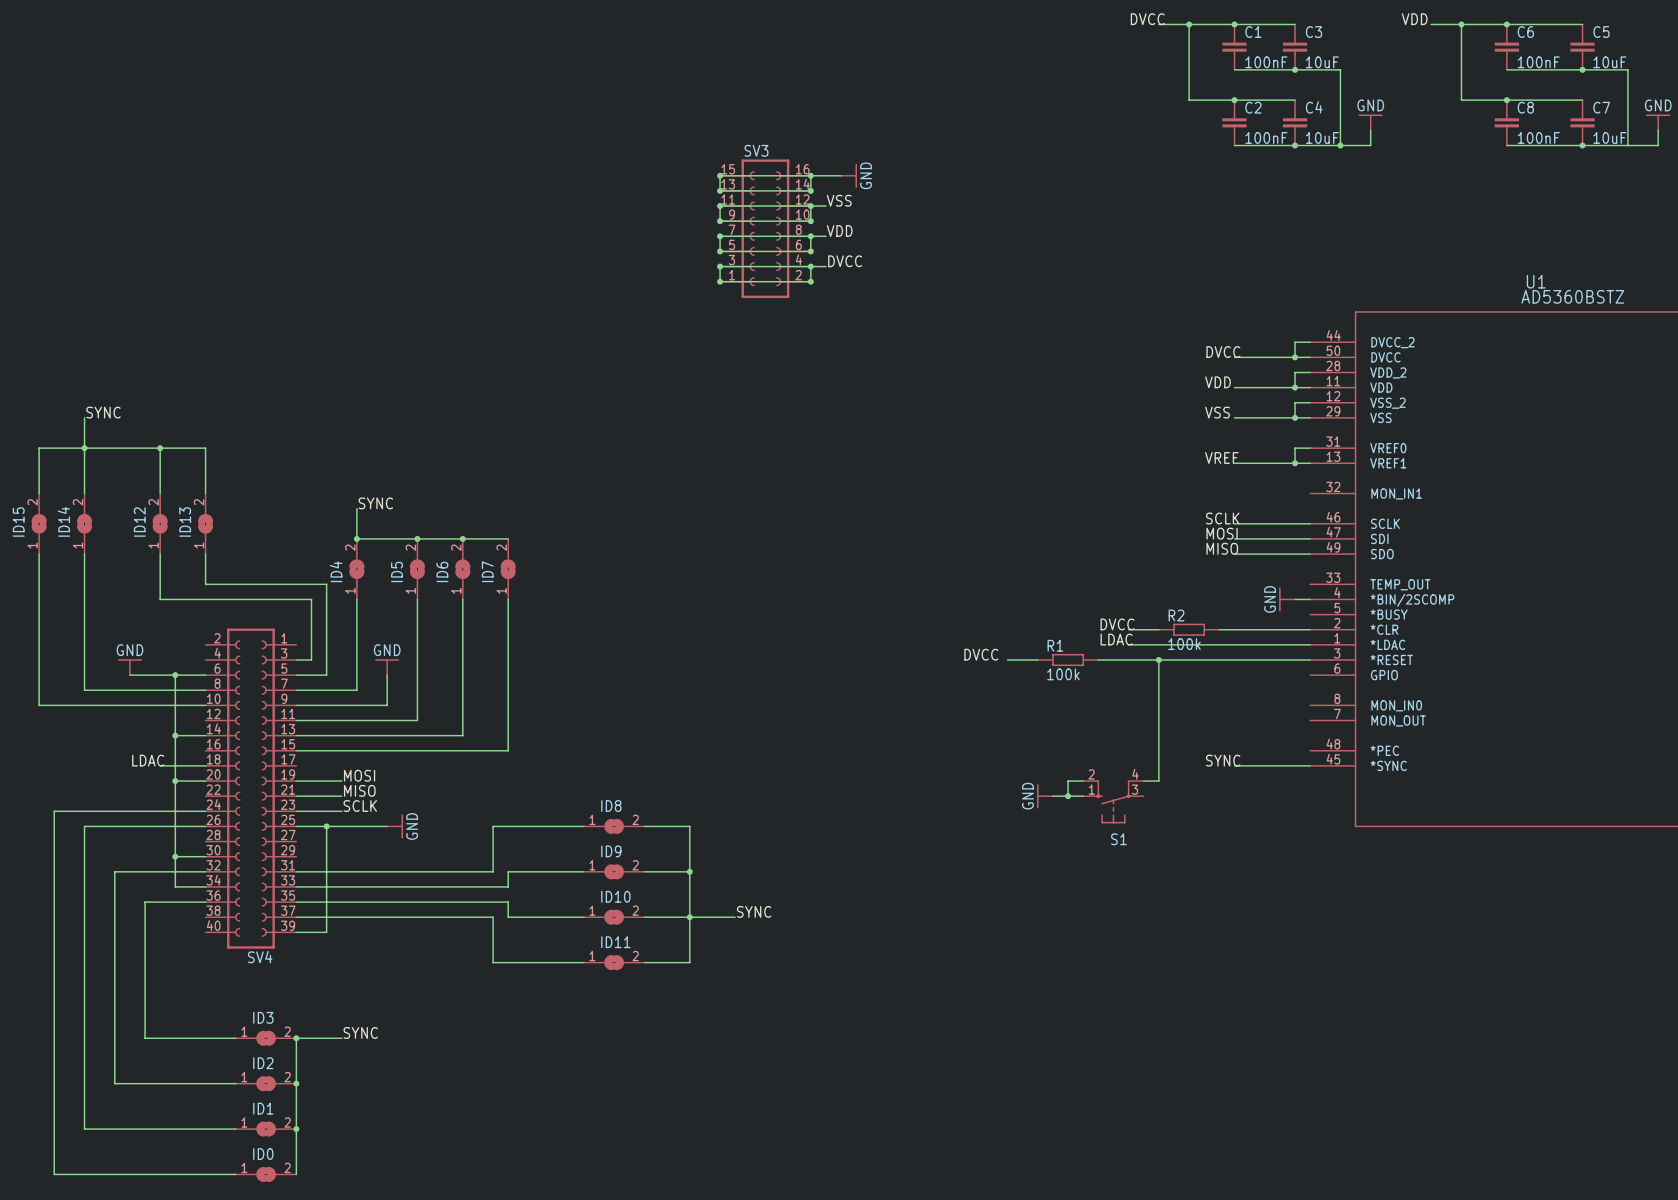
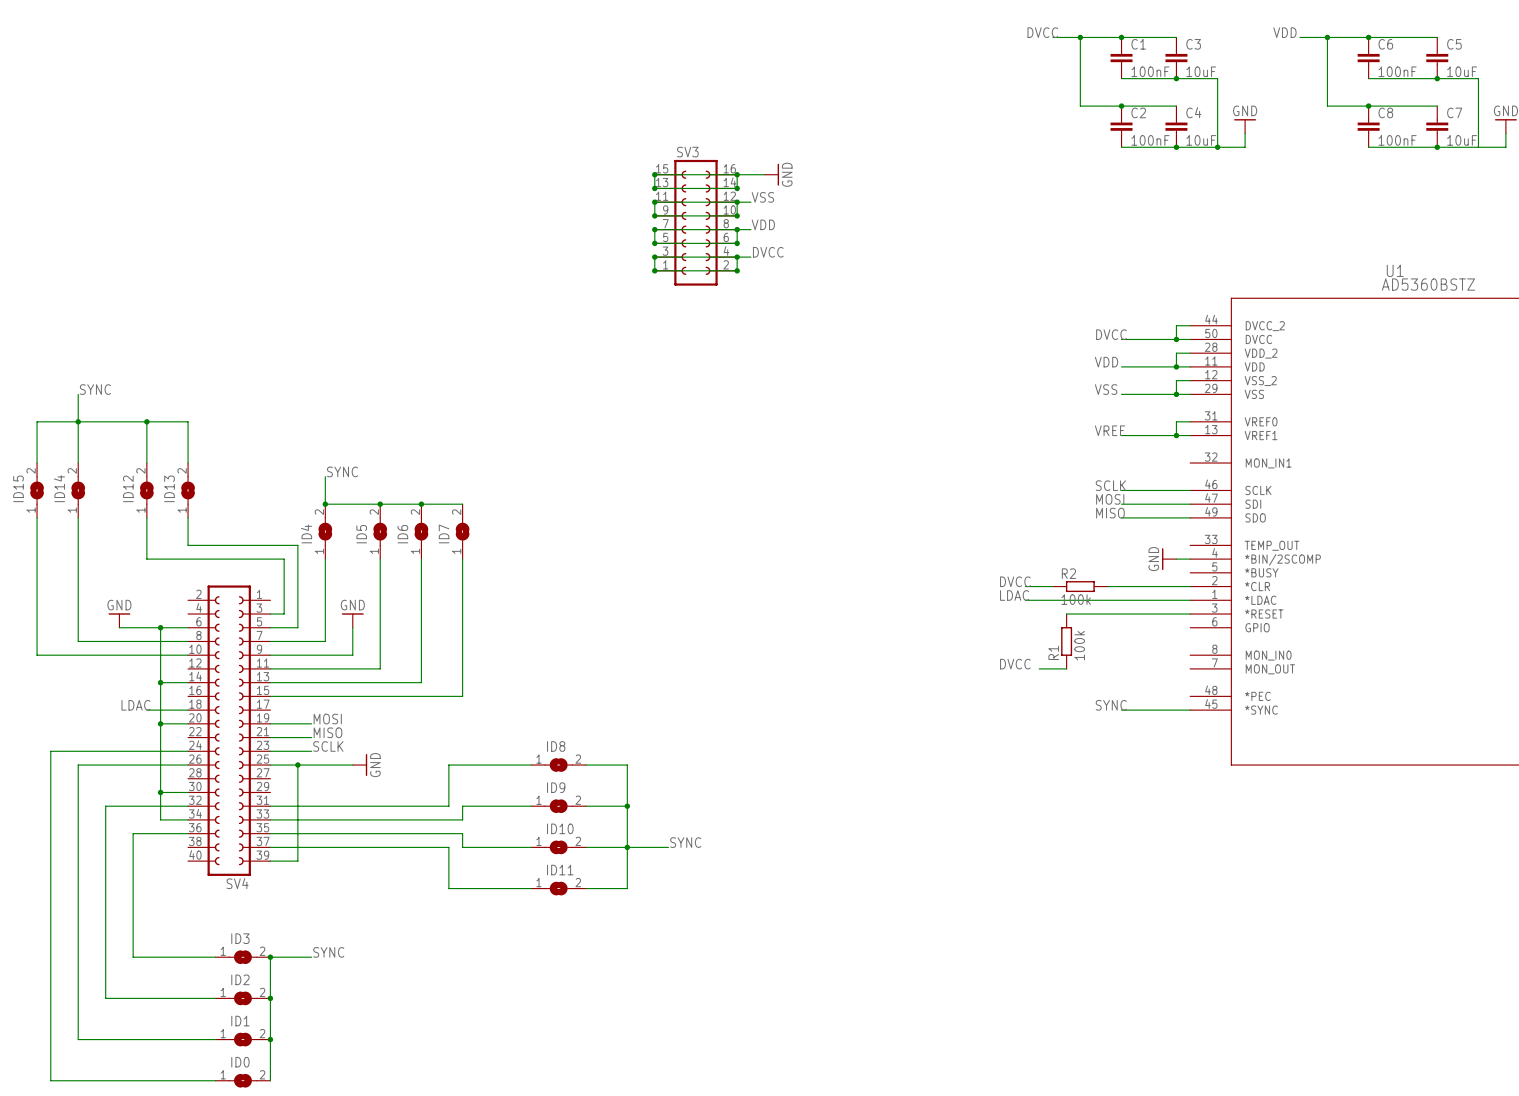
R1 name position: R1 (1055, 645) -> R1 (1053, 652)
label: DVCC (981, 654) -> none
wire: (1007, 659) (1037, 659) -> none
R1 rotation: 0° (1068, 659) -> 90° clockwise (1066, 641)
R1 position: (1068, 659) -> (1066, 641)
wire: (1098, 659) (1173, 659) -> none
wire: (1158, 659) (1158, 781) (1143, 781) -> none
junction: (1158, 659) -> none
R1 value position: 100k (1063, 674) -> 100k (1079, 645)
label: none -> DVCC (1015, 664)
wire: (1083, 781) (1068, 781) (1068, 796) -> none
power symbol: GND (1044, 796) -> none
wire: (1052, 796) (1083, 796) -> (1039, 668) (1066, 668)
junction: (1068, 796) -> none
S1: (1113, 801) -> none

